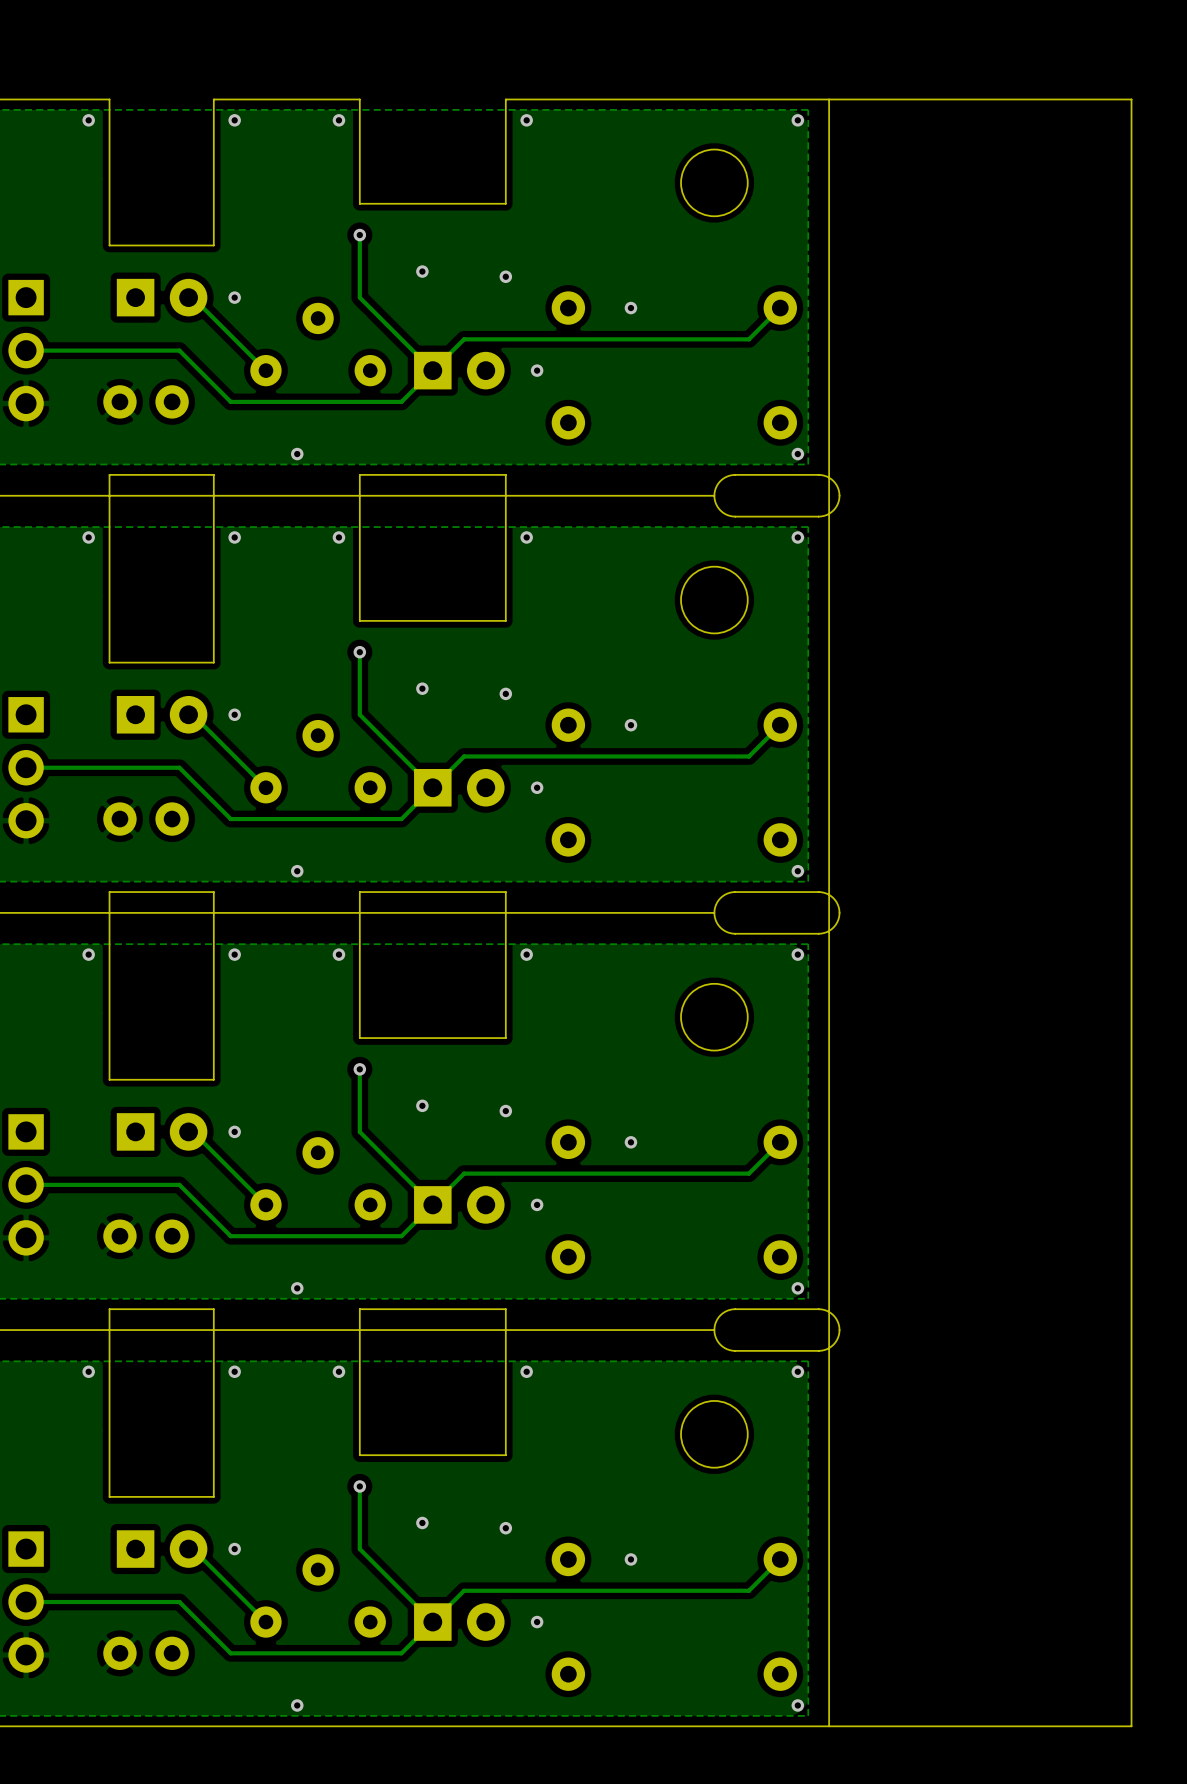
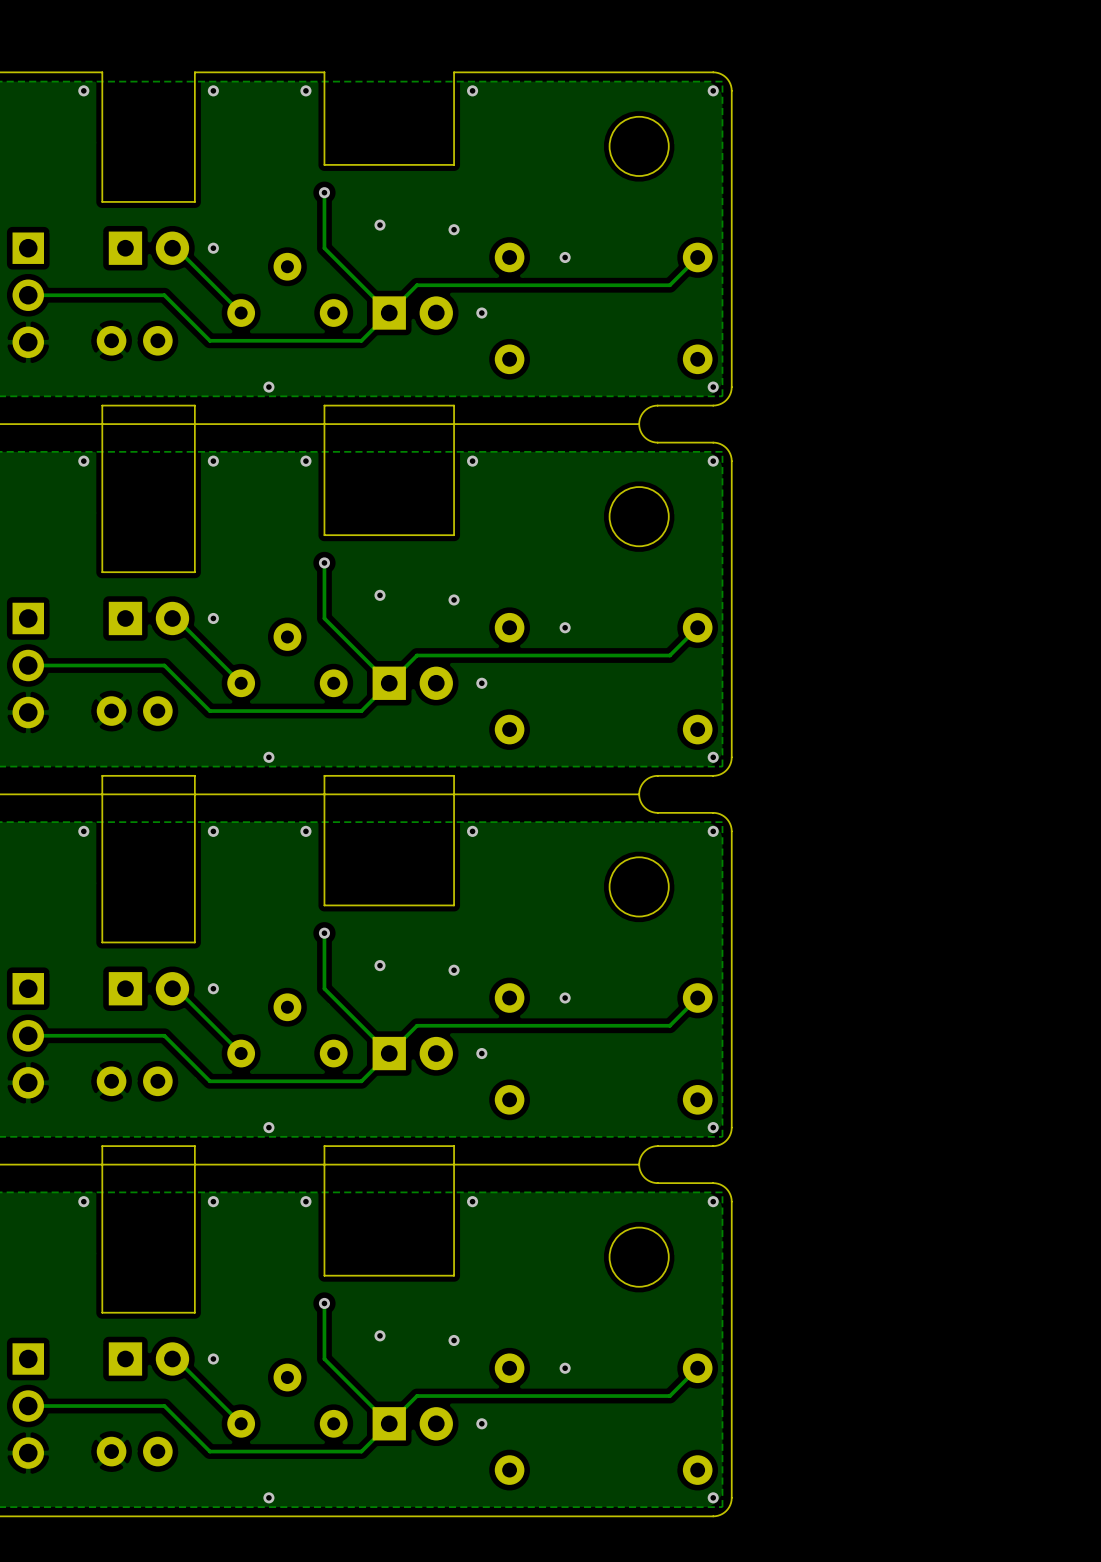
board edge: (797, 99) (1131, 99) (1131, 1726) (797, 1726) -> (713, 1183) (726, 1188) (731, 1201) (731, 1497) (726, 1510) (713, 1516)
board edge: (829, 99) (829, 1726) -> none
board edge: (797, 474) (821, 475) (829, 477) (836, 485) (839, 495) (836, 506) (829, 513) (821, 516) (797, 516) -> (713, 405) (726, 400) (731, 387) (731, 90) (726, 77) (713, 72)
board edge: (797, 892) (821, 892) (829, 894) (836, 902) (839, 912) (836, 923) (829, 930) (821, 933) (797, 933) -> (713, 775) (726, 770) (731, 757) (731, 461) (726, 448) (713, 442)
board edge: (797, 1309) (821, 1309) (829, 1311) (836, 1319) (839, 1330) (836, 1340) (829, 1348) (821, 1350) (797, 1350) -> (713, 1146) (726, 1140) (731, 1127) (731, 831) (726, 818) (713, 812)

